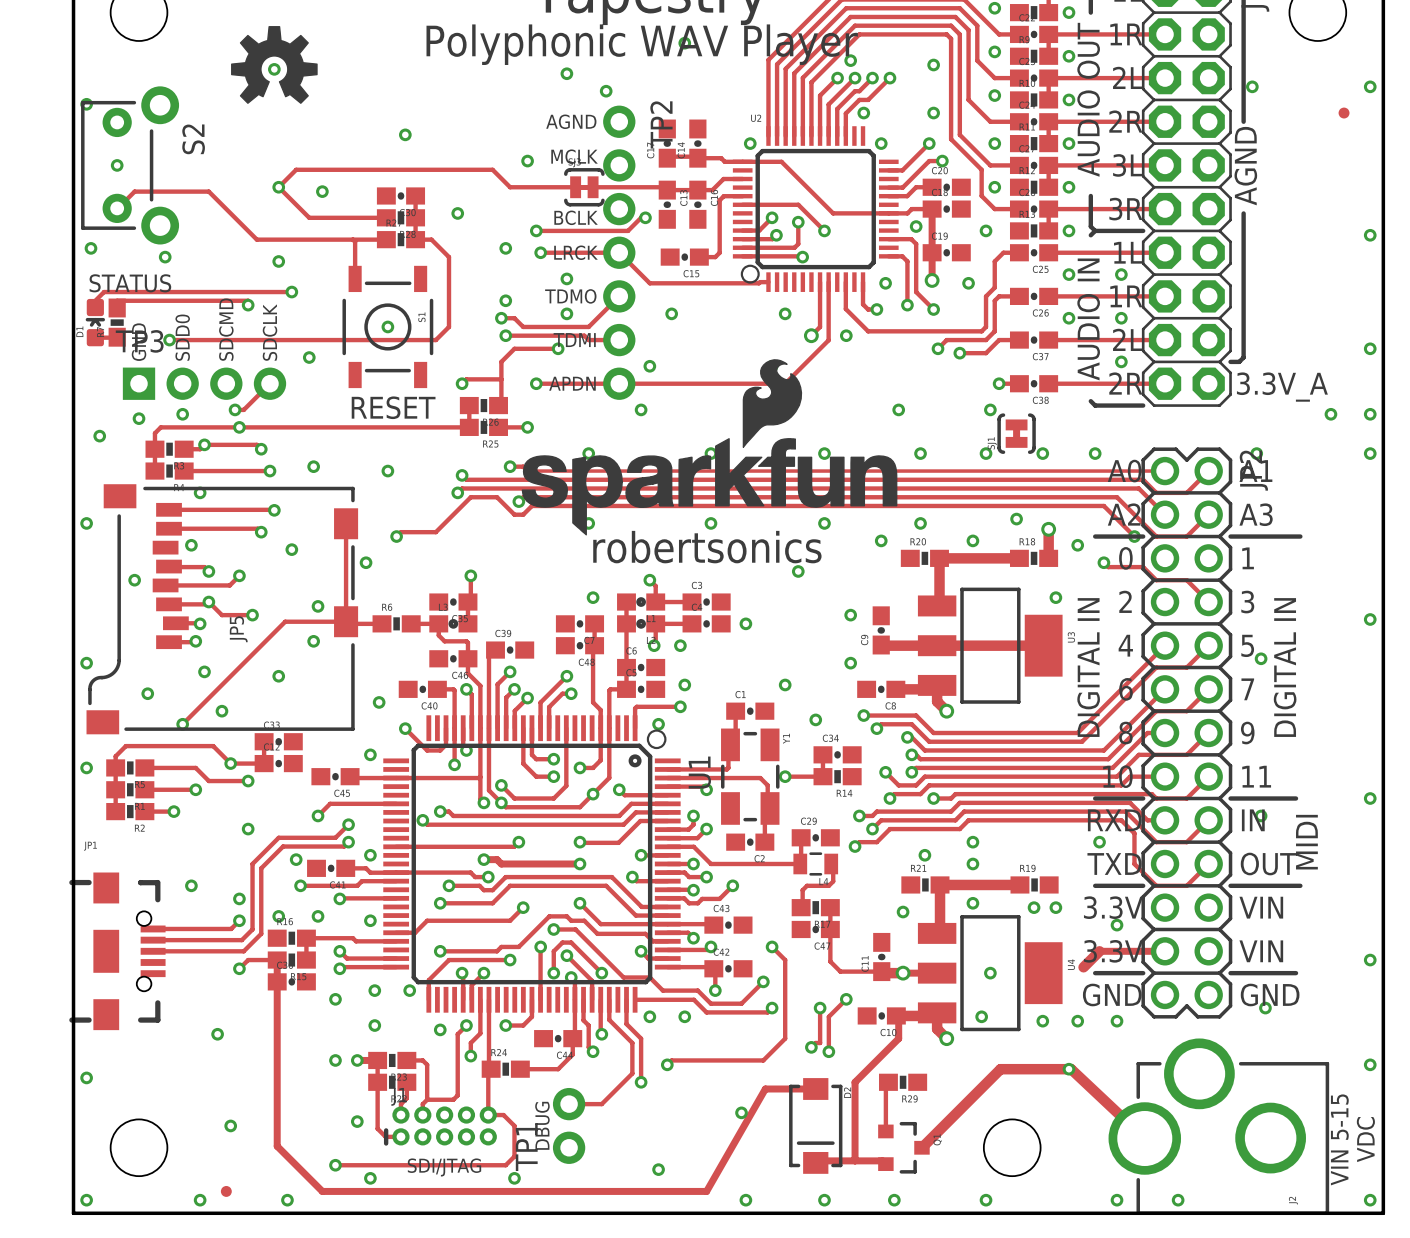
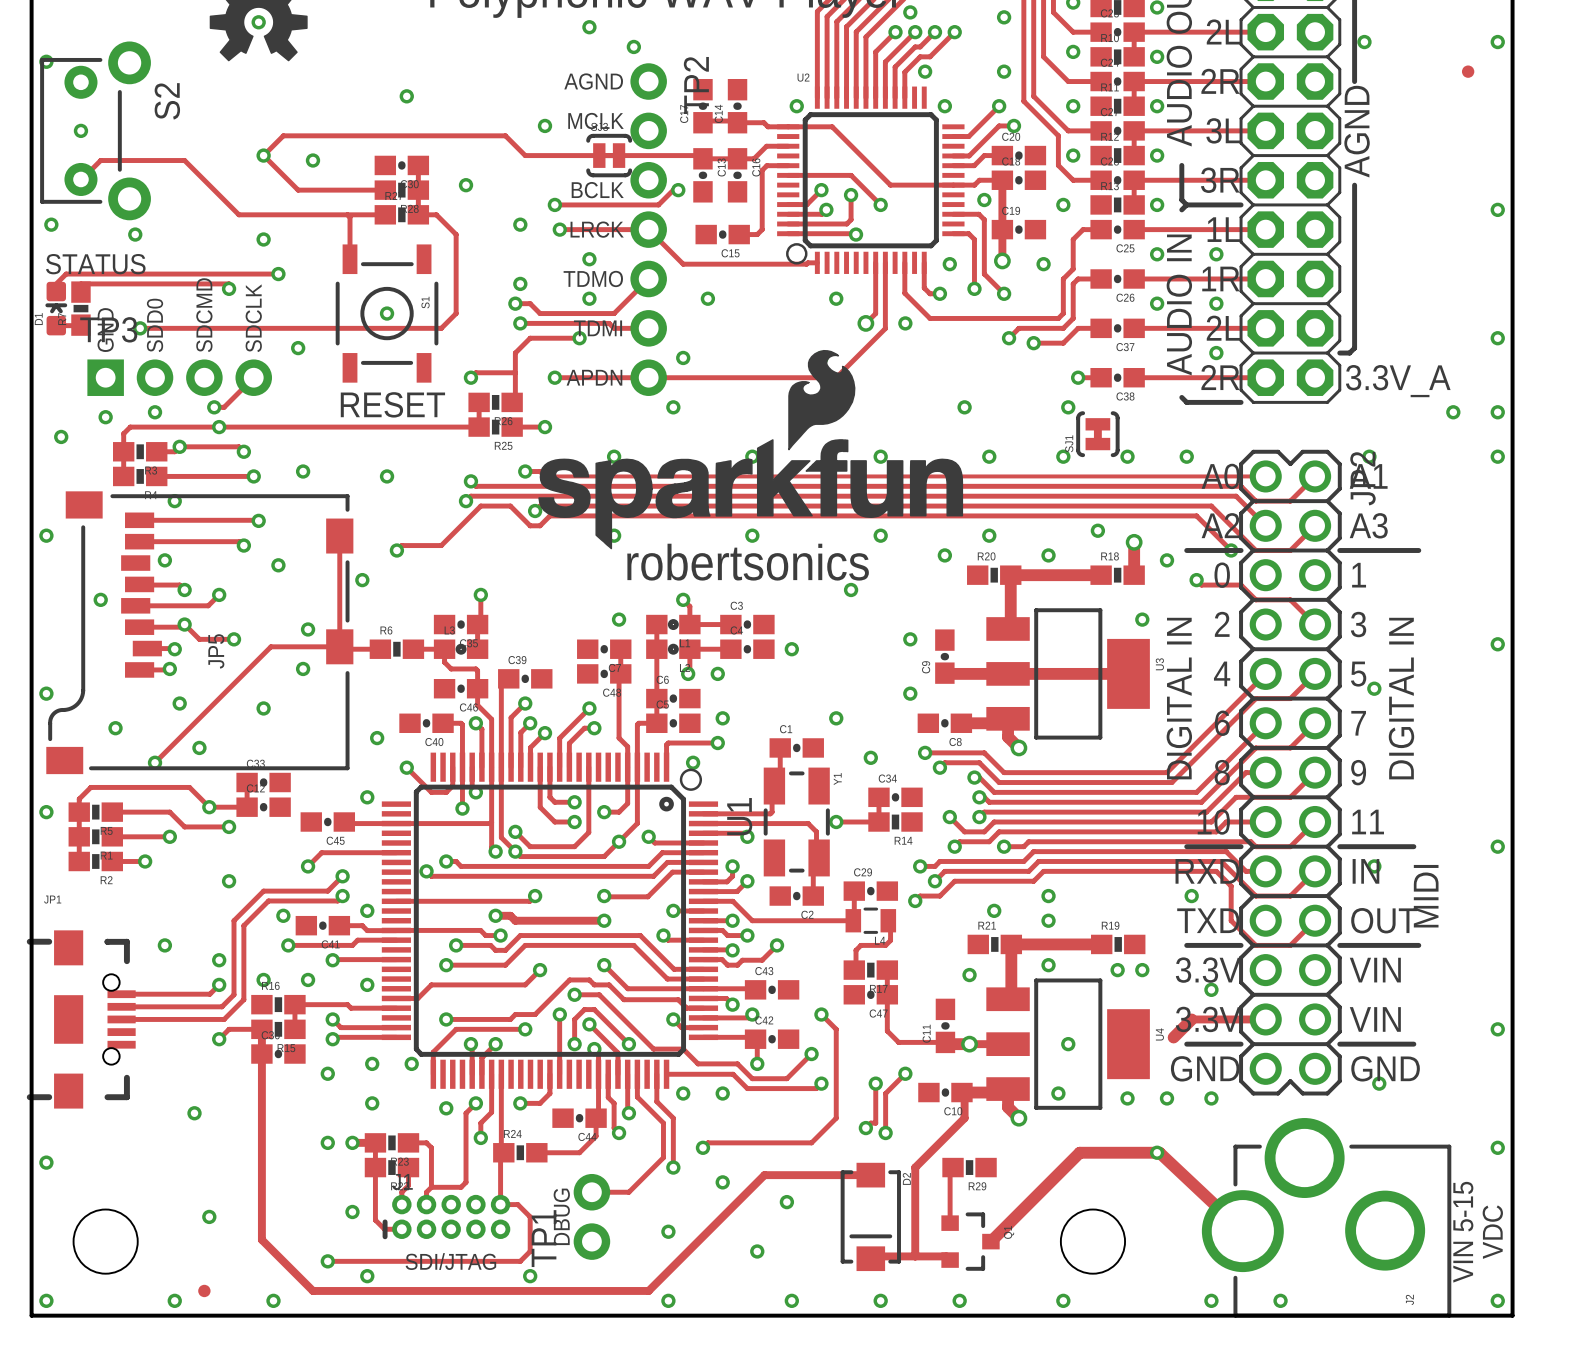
track: (765, 1088) (706, 1191) (619, 1191) -> (813, 1175) (764, 1175) (648, 1290)
via: none -> (722, 1182)
via: none -> (668, 1231)
via: none -> (757, 1251)
via: (658, 1169) -> none
via: none -> (668, 1300)

